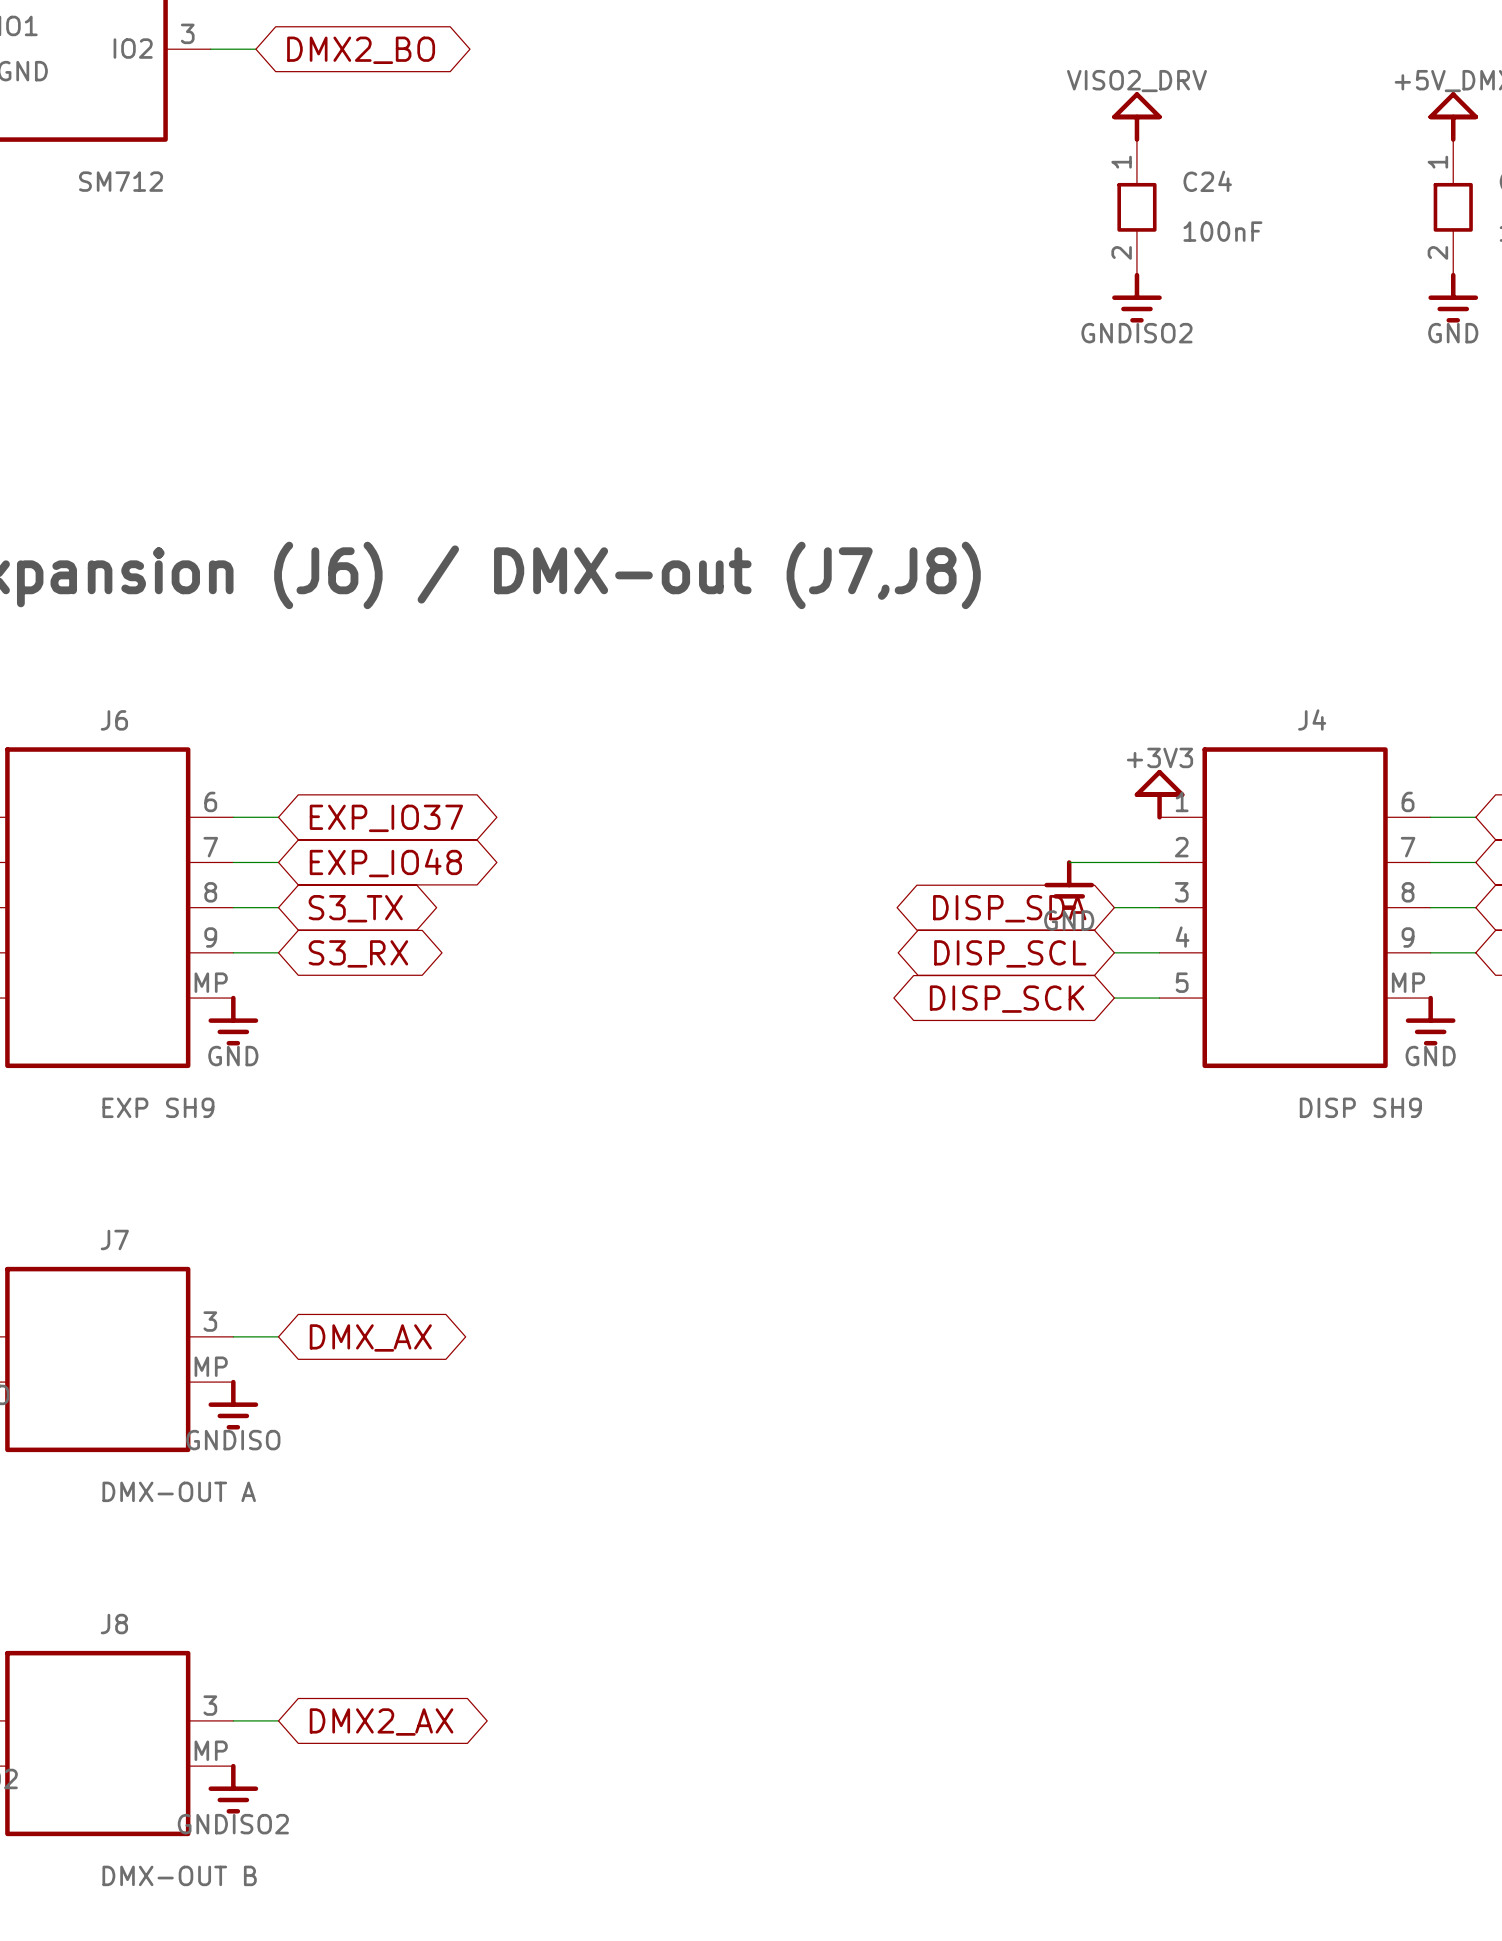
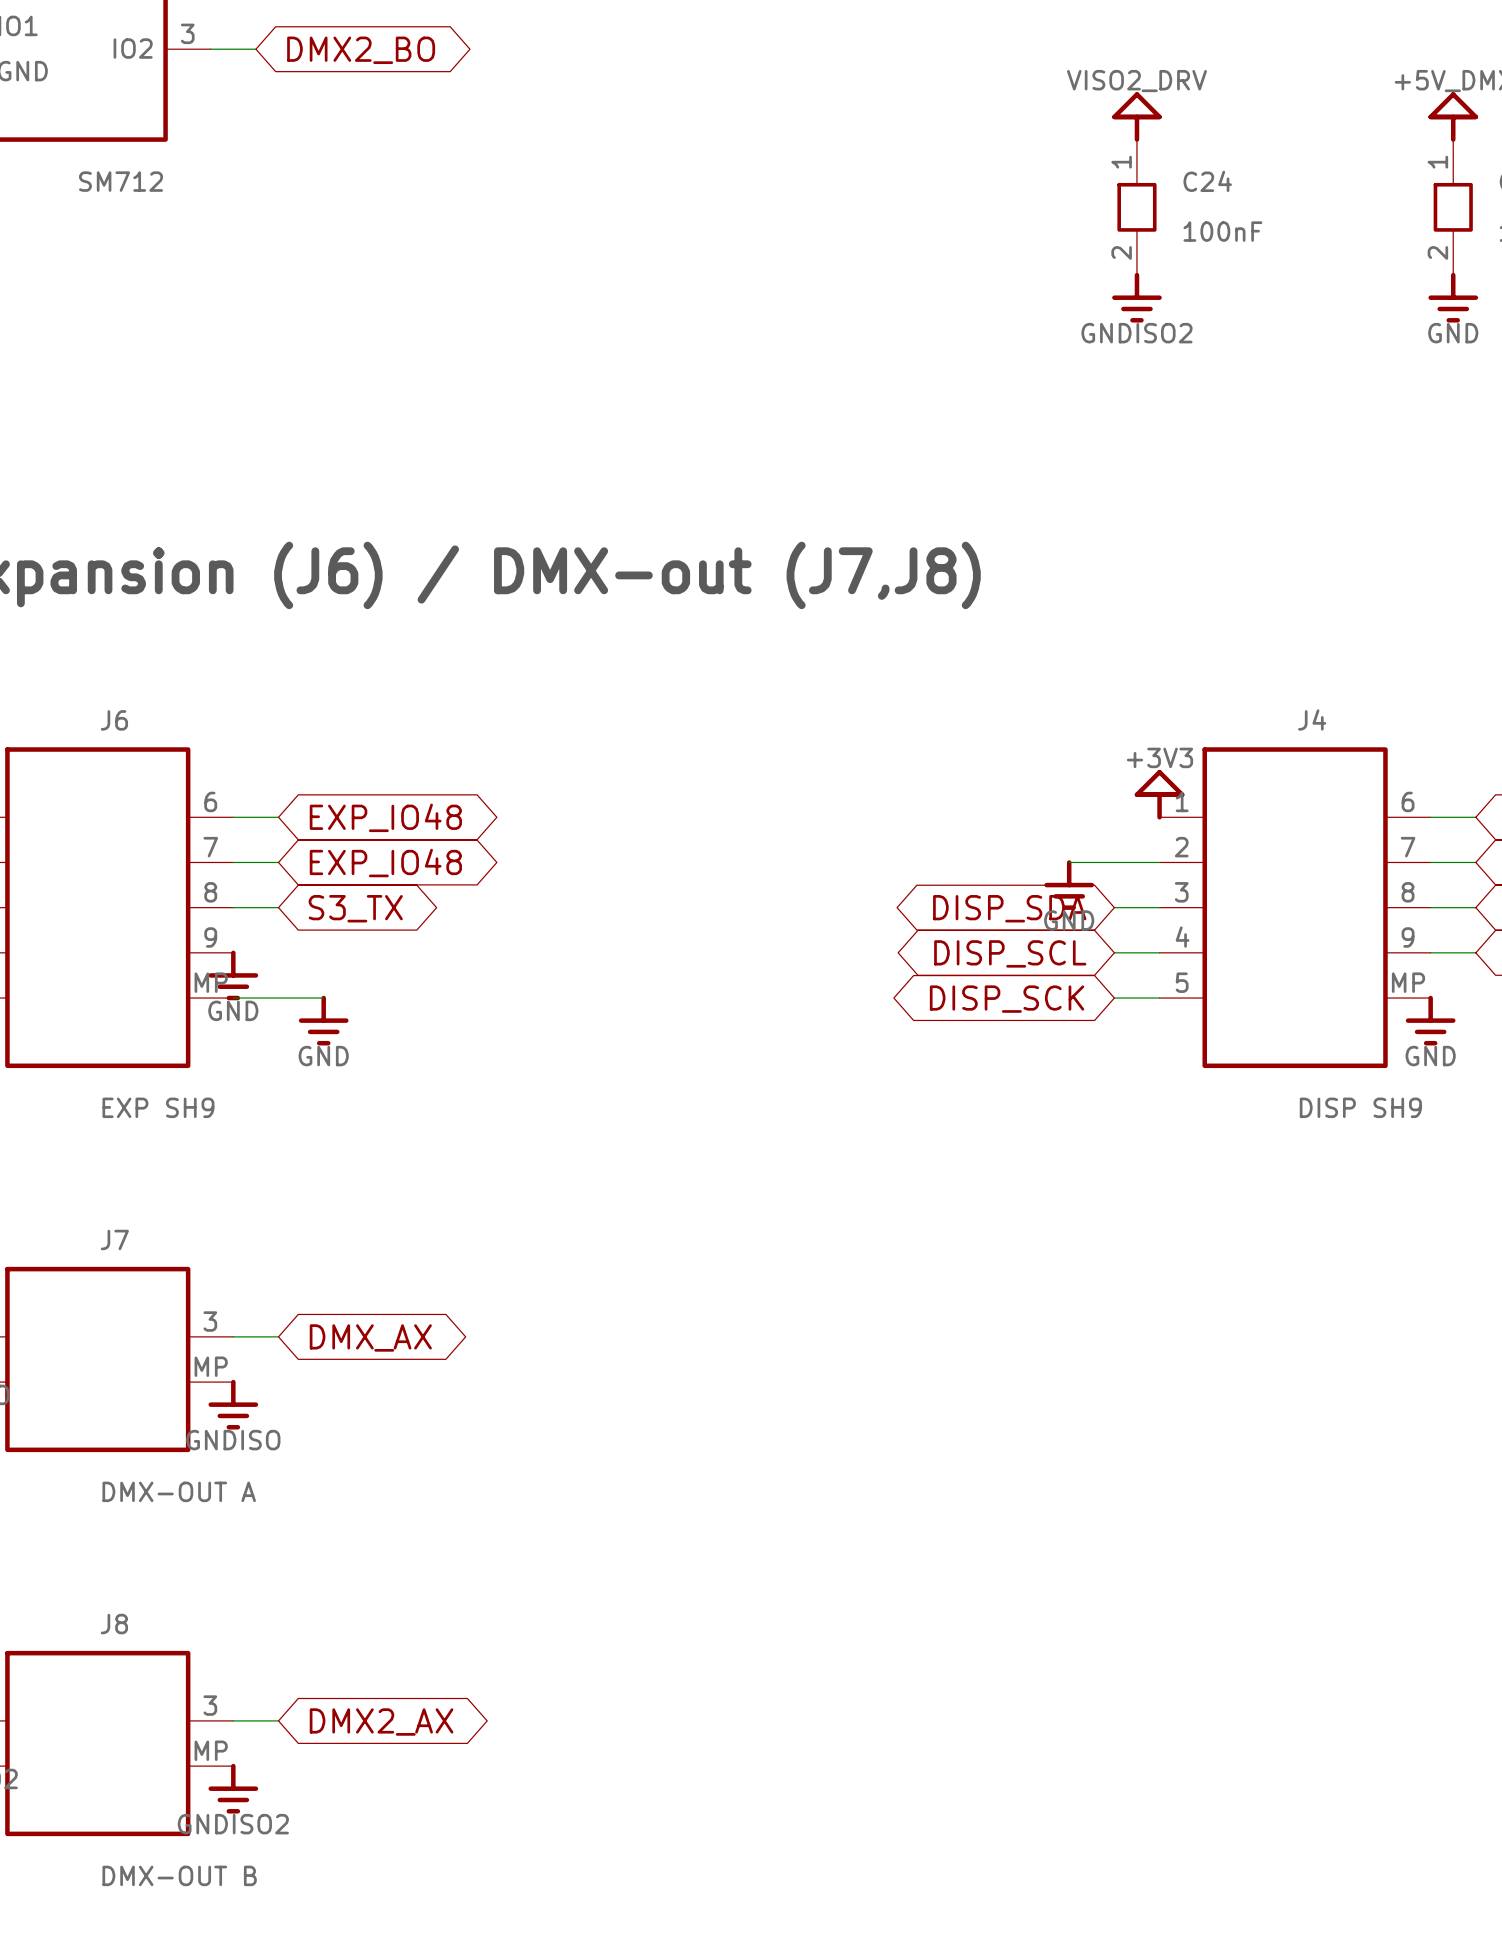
global label: EXP_IO37 (386, 818) -> EXP_IO48 (385, 817)
wire: (233, 952) (278, 952) -> none
global label: S3_RX (358, 953) -> none
power symbol: none -> GND (233, 975)
wire: none -> (233, 998) (323, 998)
power symbol: GND (233, 1020) -> none
power symbol: none -> GND (323, 1020)

